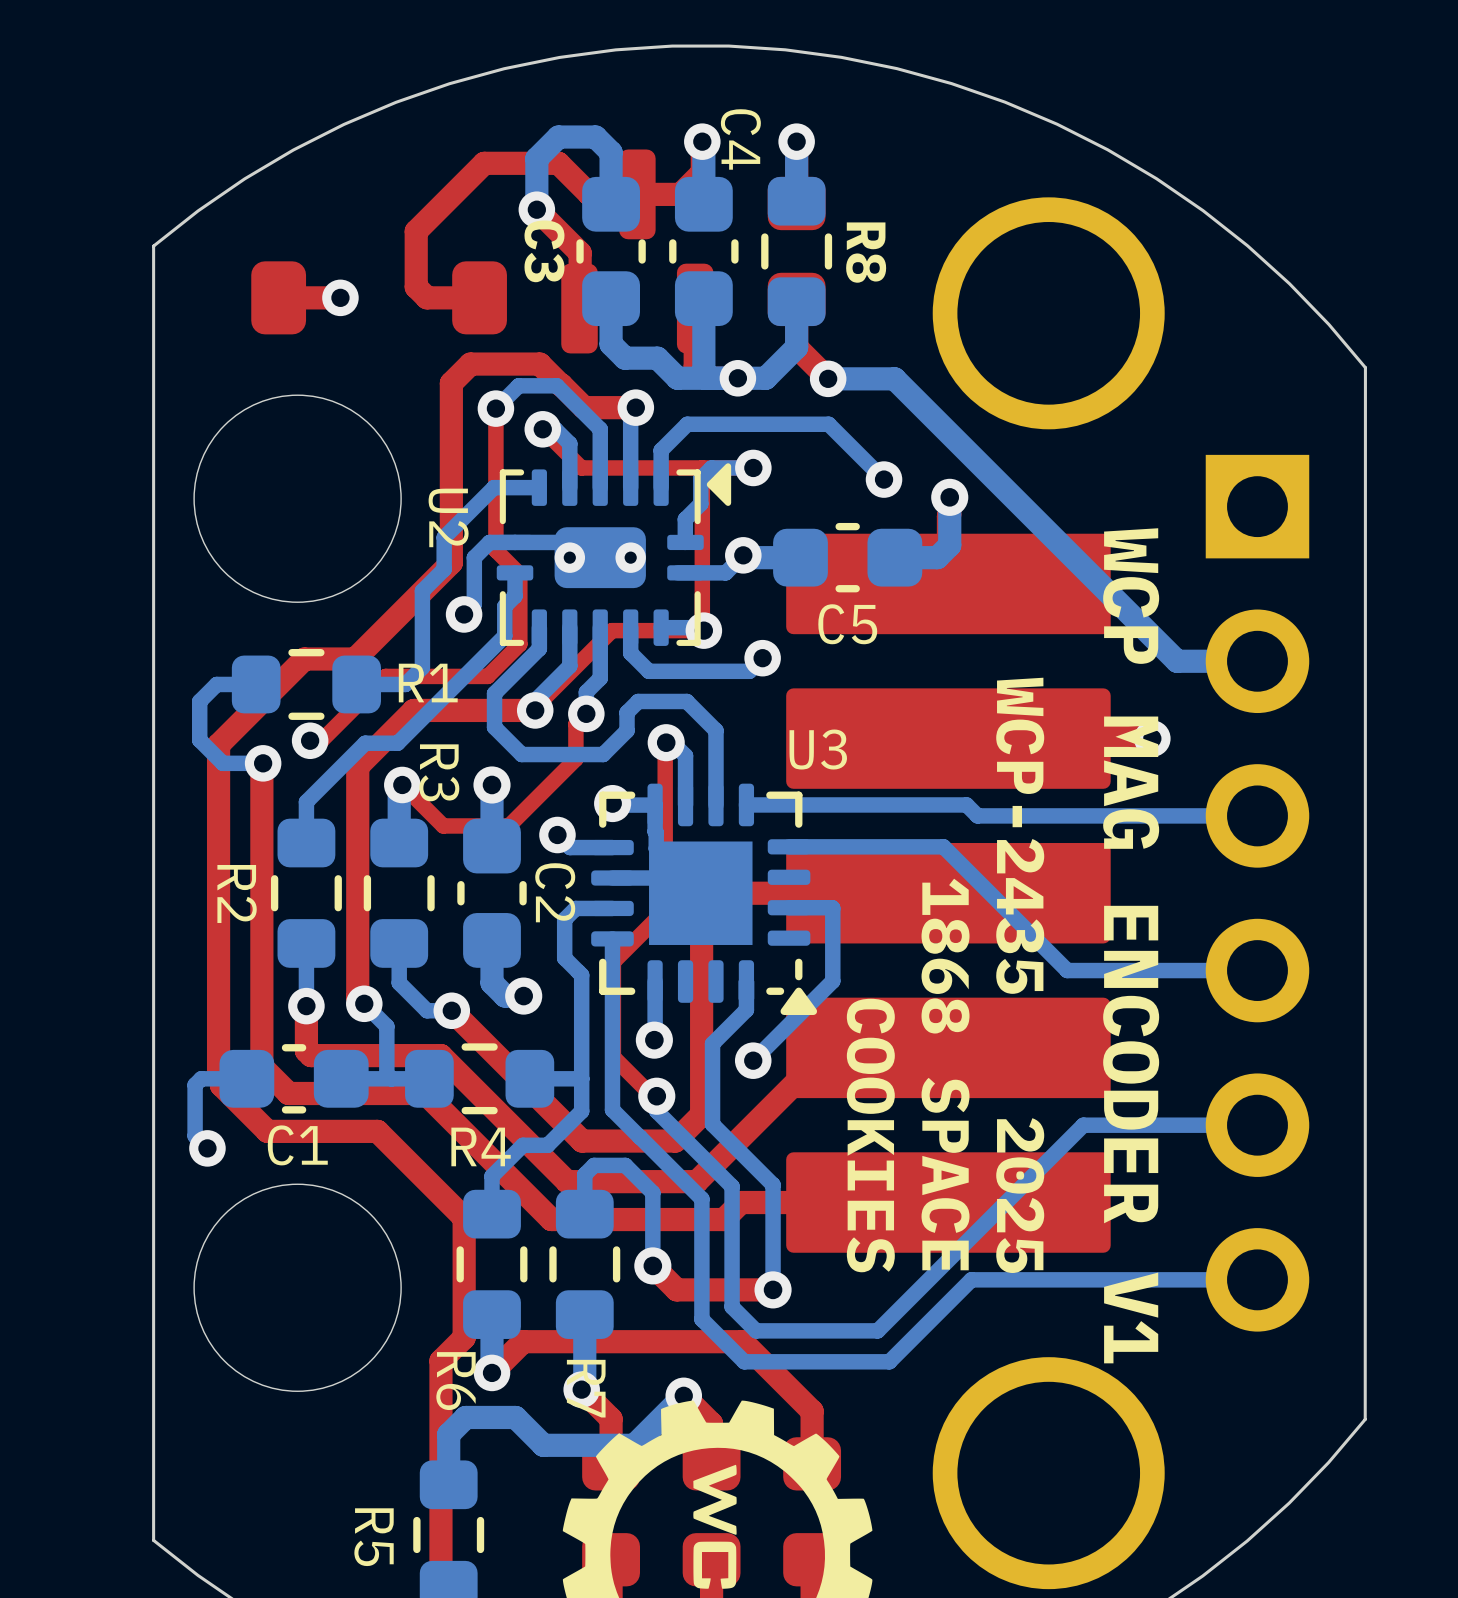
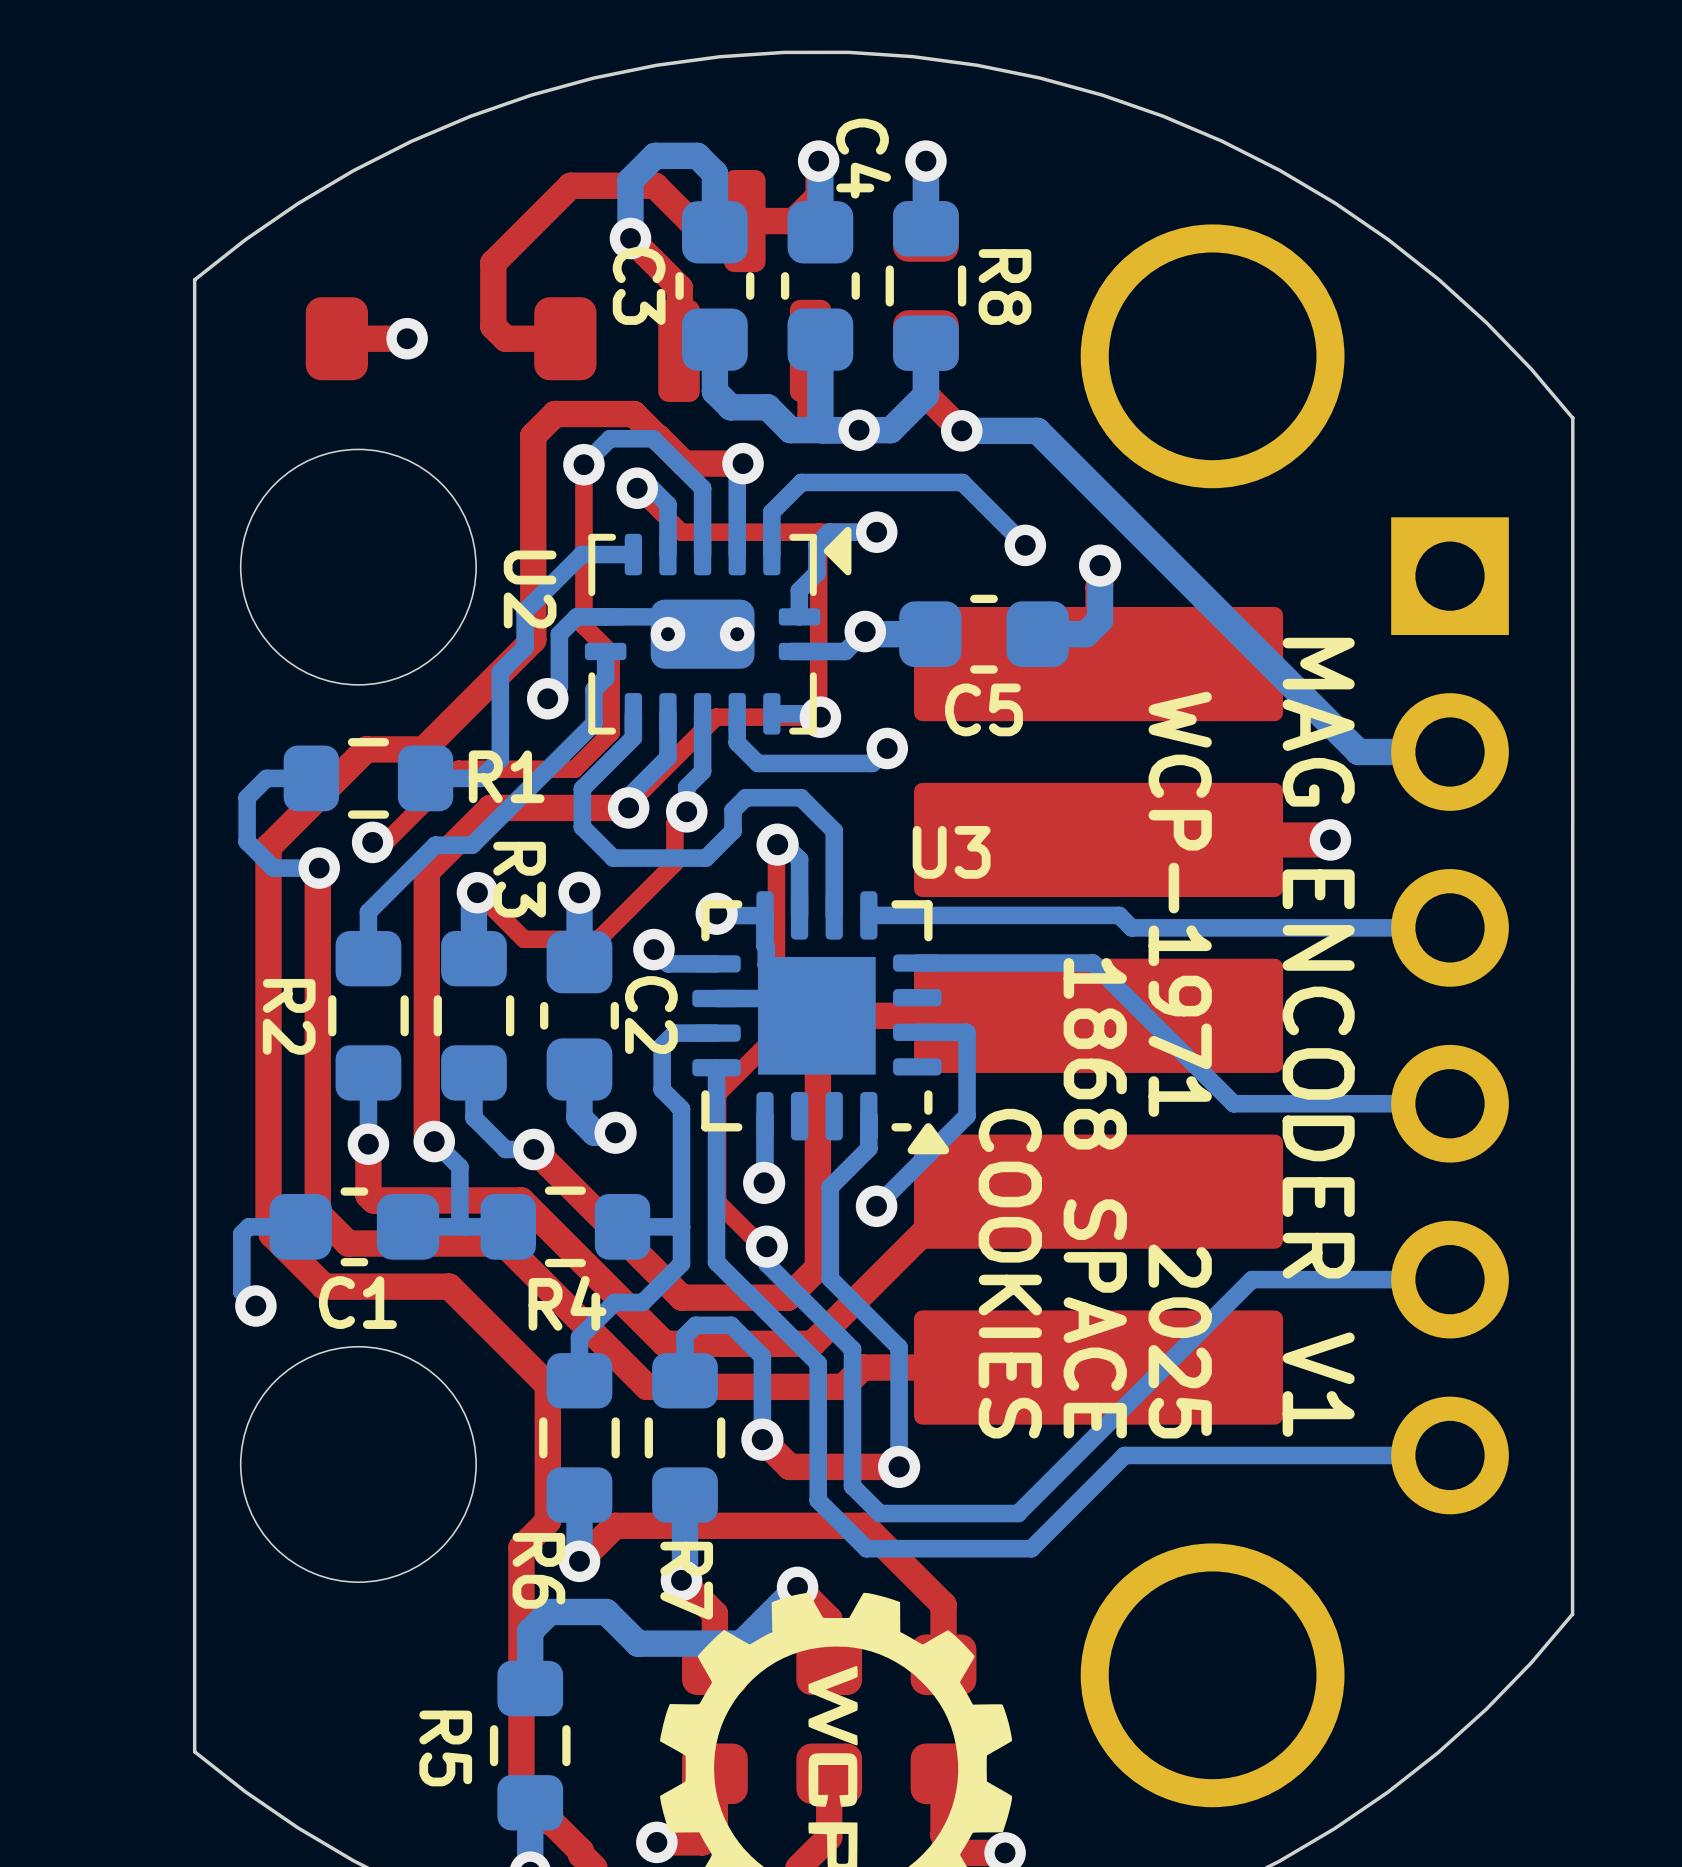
text: WCP MAG ENCODER V1 (1131, 945) -> MAG ENCODER V1 (1318, 1037)
text: WCP-2435 2025 (1020, 975) -> WCP-1971 2025 (1180, 1065)

